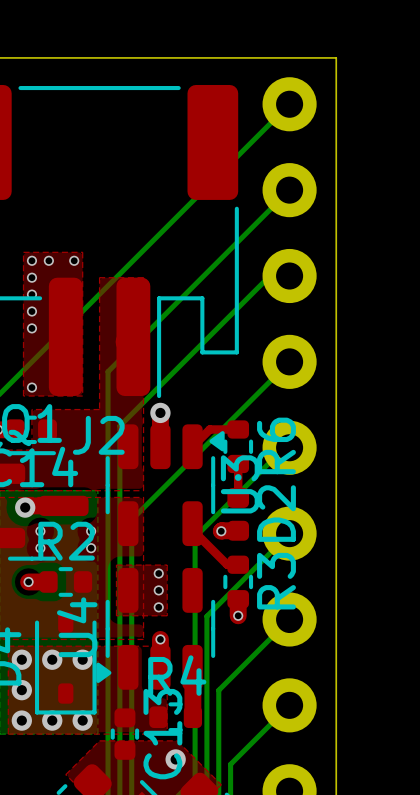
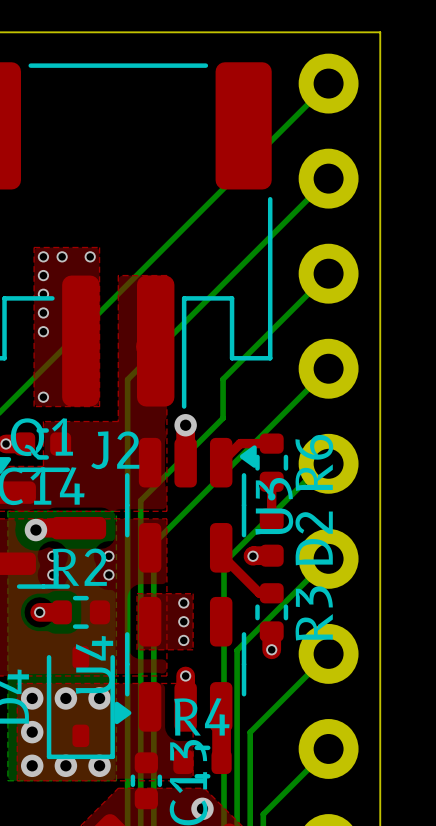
bottom track: (289, 276) (269, 276) (119, 426) (119, 480) -> (328, 273) (223, 379) (223, 418) (140, 500)

